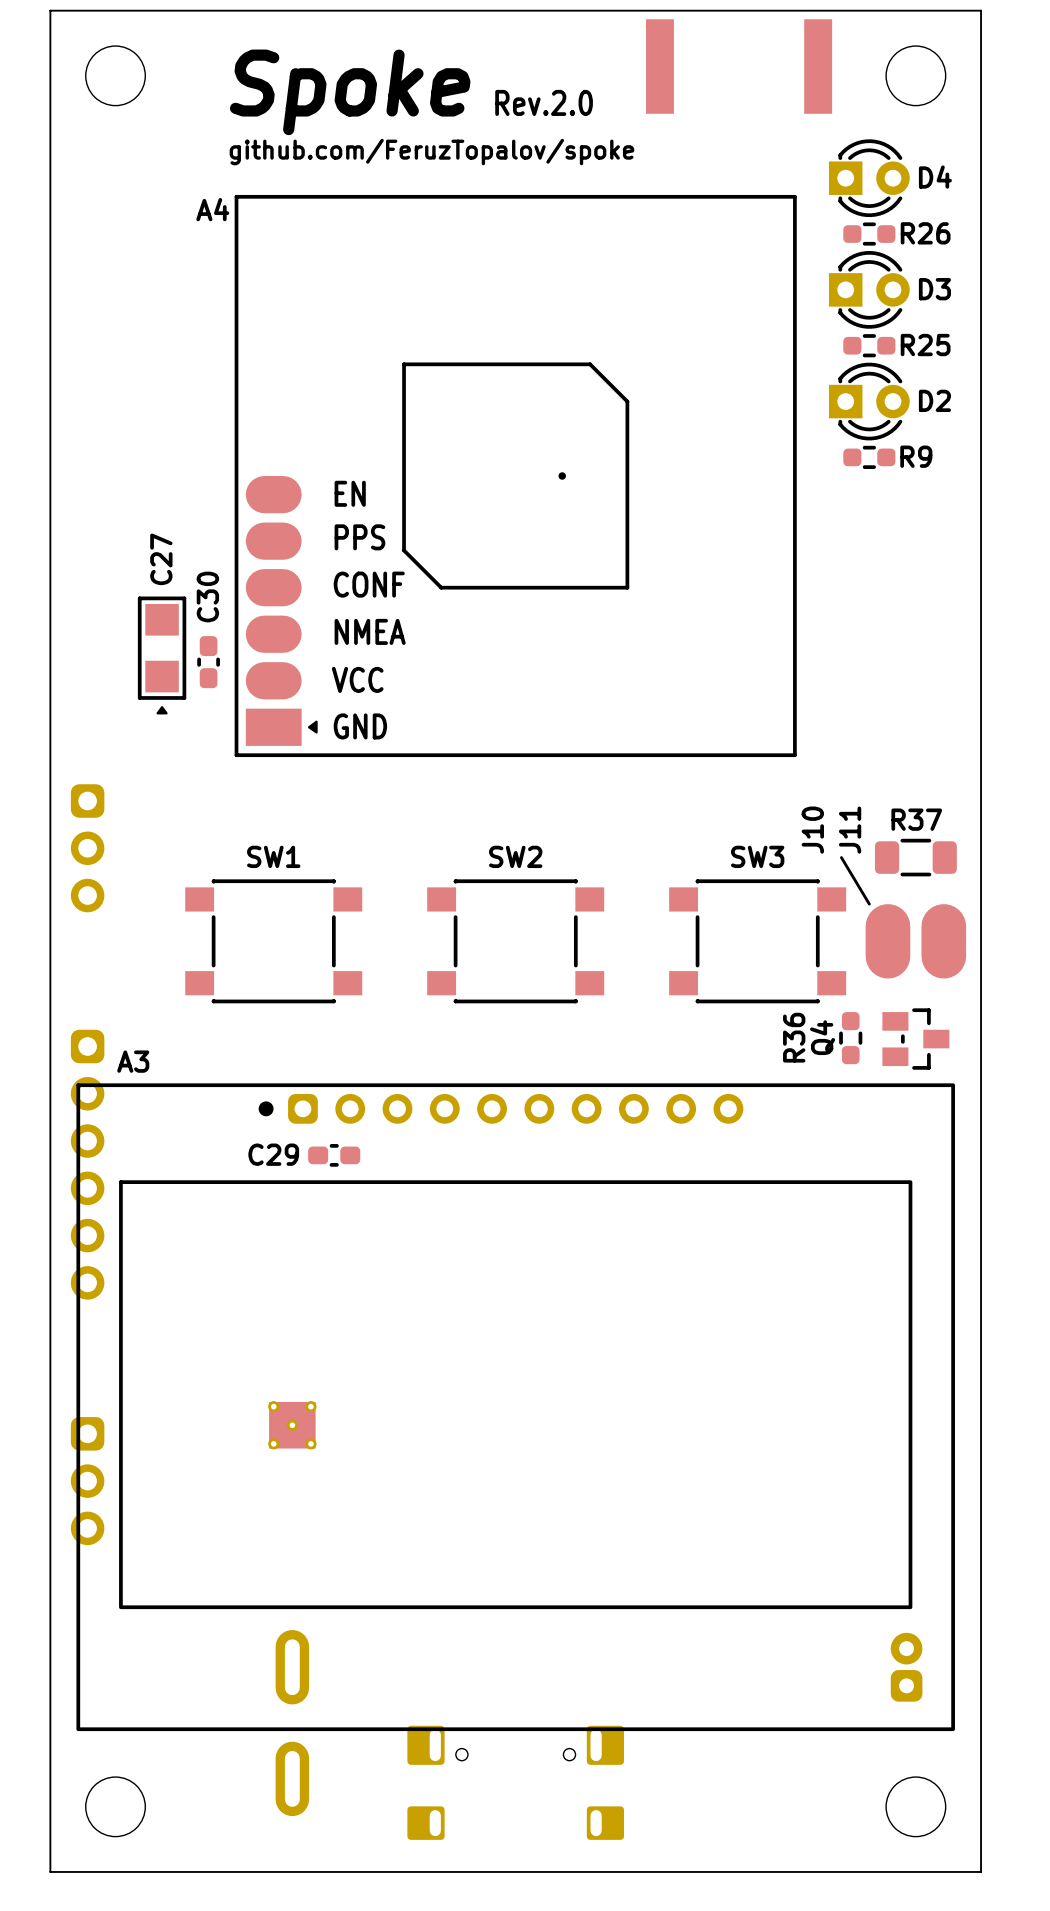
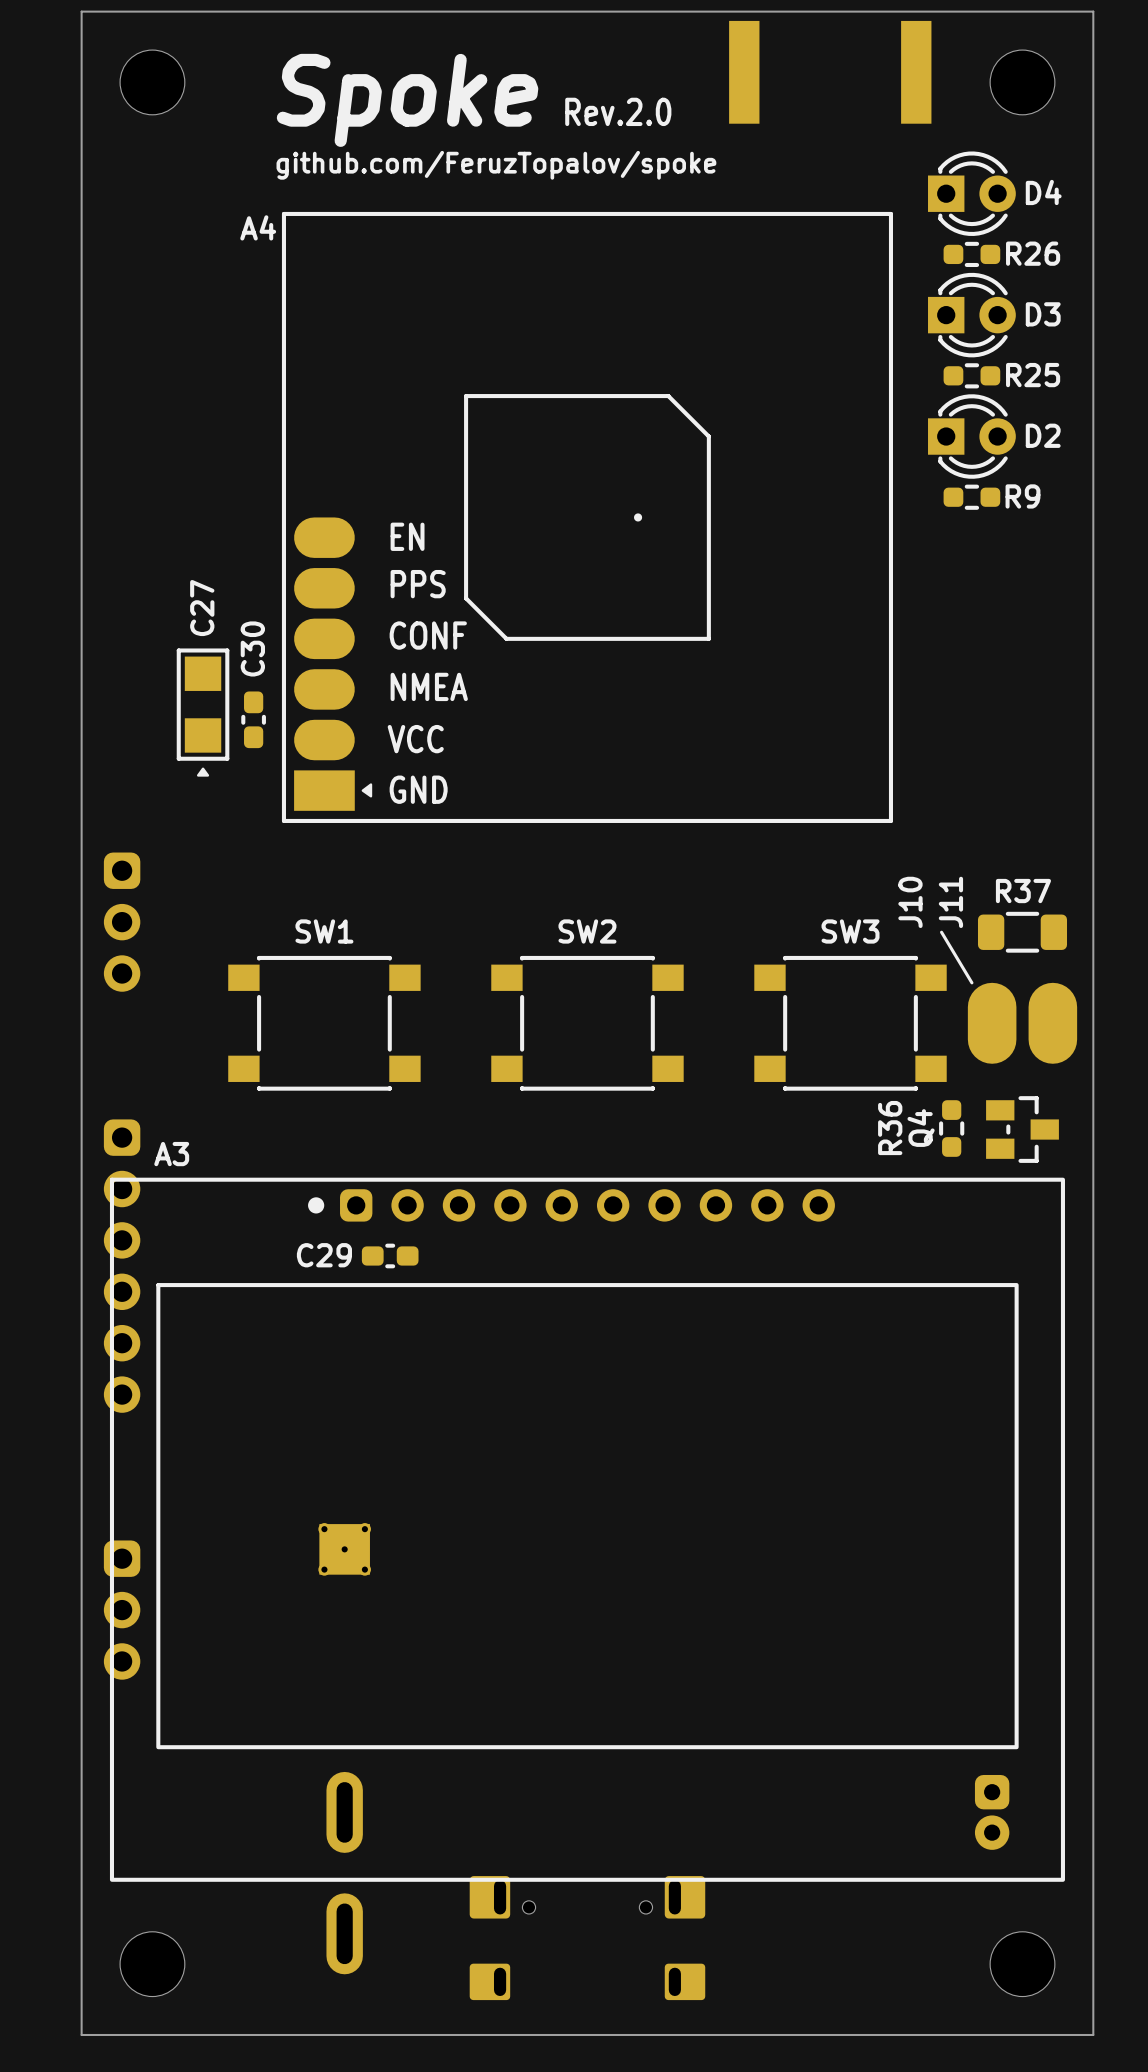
part rotation: 0° (906, 1667) -> 180° (992, 1812)

